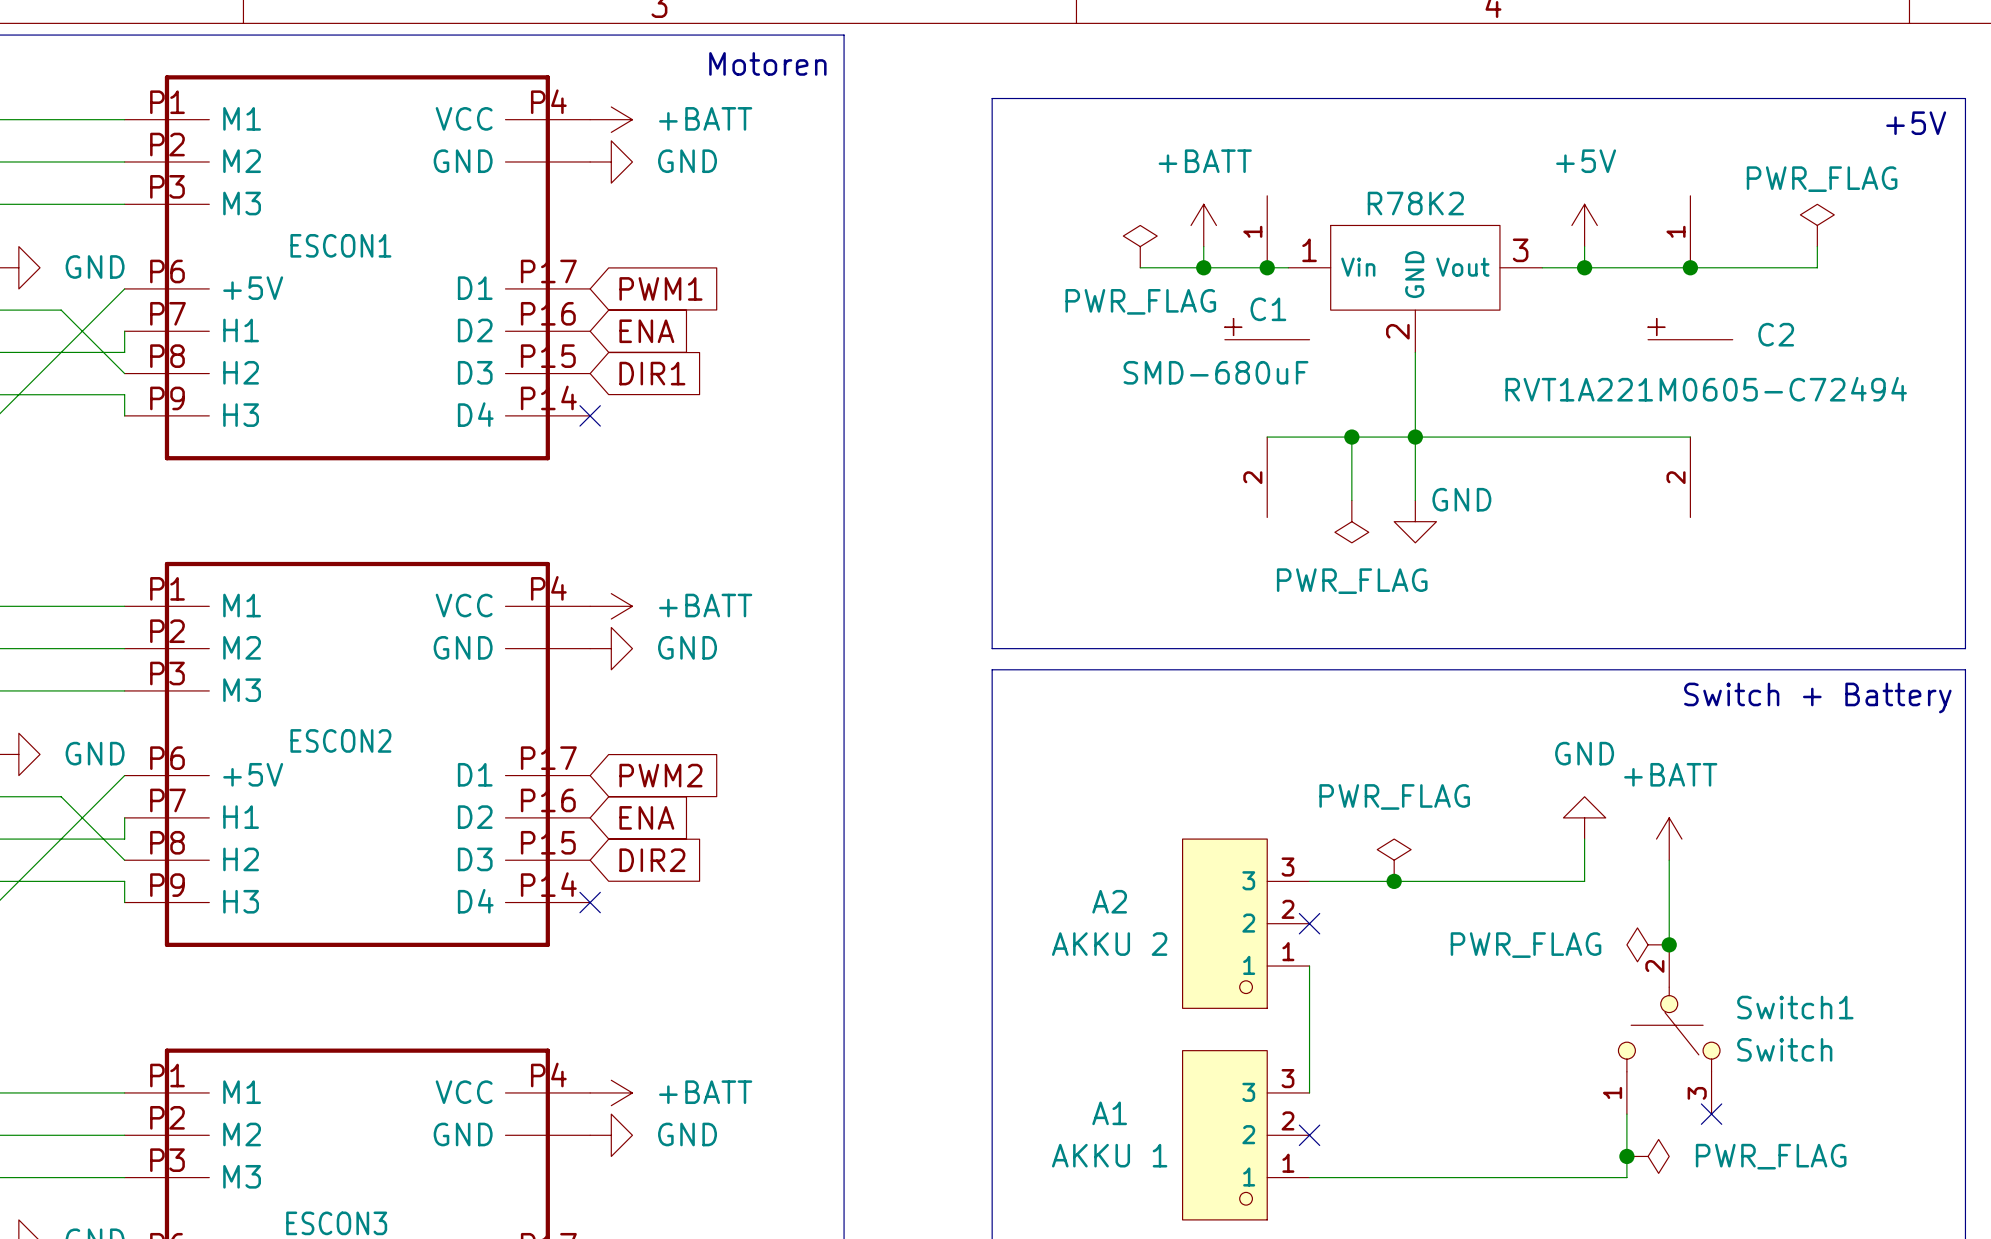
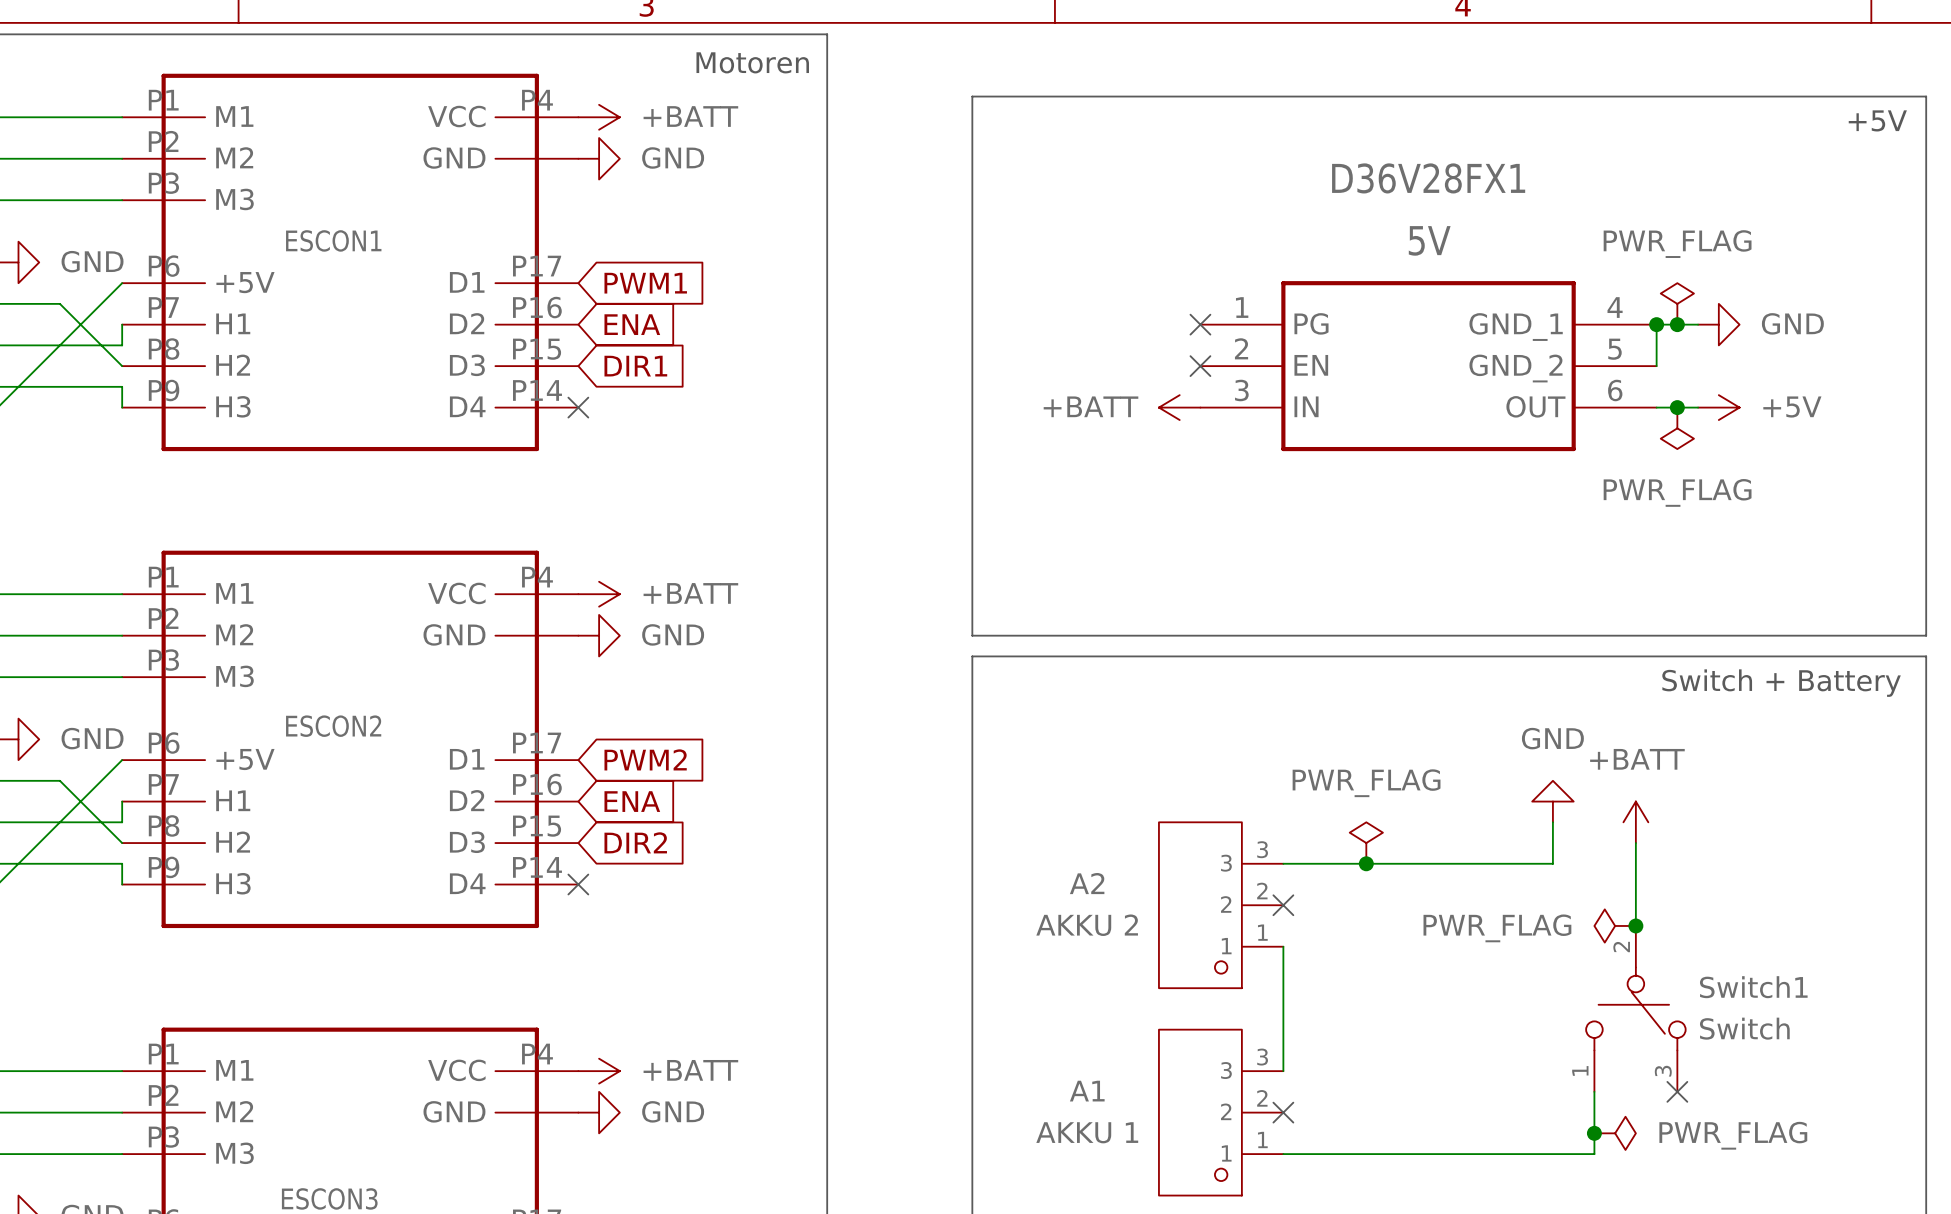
power symbol text position: +BATT (1205, 161) -> +BATT (1091, 406)
power symbol rotation: 0° (1203, 225) -> 90° counterclockwise (1179, 407)
power symbol position: +BATT (1203, 225) -> +BATT (1179, 407)
power symbol rotation: 0° (1584, 225) -> 90° clockwise (1718, 407)
power symbol position: +5V (1584, 225) -> +5V (1718, 407)
power symbol: PWR_FLAG (1817, 225) -> none
power symbol: PWR_FLAG (1140, 246) -> none
wire: (1203, 246) (1203, 267) -> none
wire: (1584, 246) (1584, 267) -> none
wire: (1817, 246) (1817, 267) (1542, 267) -> none
wire: (1140, 267) (1288, 267) -> none
junction: (1203, 267) -> none
junction: (1267, 267) -> none
junction: (1584, 267) -> none
junction: (1690, 267) -> none
R78K2: (1415, 288) -> none
power symbol: none -> PWR_FLAG (1677, 303)
no-connect mark: none -> (1200, 324)
junction: none -> (1656, 324)
junction: none -> (1677, 324)
wire: none -> (1698, 324) (1656, 324) (1656, 366)
wire: (1415, 352) (1415, 500) -> none
C1: SMD-680uF (1267, 356) -> none
C2: RVT1A221M0605-C72494 (1690, 356) -> none
no-connect mark: none -> (1200, 366)
D36V28FX1: none -> 5V (1428, 366)
wire: none -> (1656, 407) (1698, 407)
junction: none -> (1677, 407)
wire: (1267, 437) (1690, 437) -> none
wire: (1351, 437) (1351, 500) -> none
junction: (1351, 437) -> none
junction: (1415, 437) -> none
power symbol: none -> PWR_FLAG (1677, 428)
power symbol text position: GND (1461, 499) -> GND (1792, 323)
power symbol: PWR_FLAG (1351, 521) -> none
power symbol rotation: 0° (1415, 521) -> 90° counterclockwise (1718, 324)
power symbol position: GND (1415, 521) -> GND (1718, 324)

